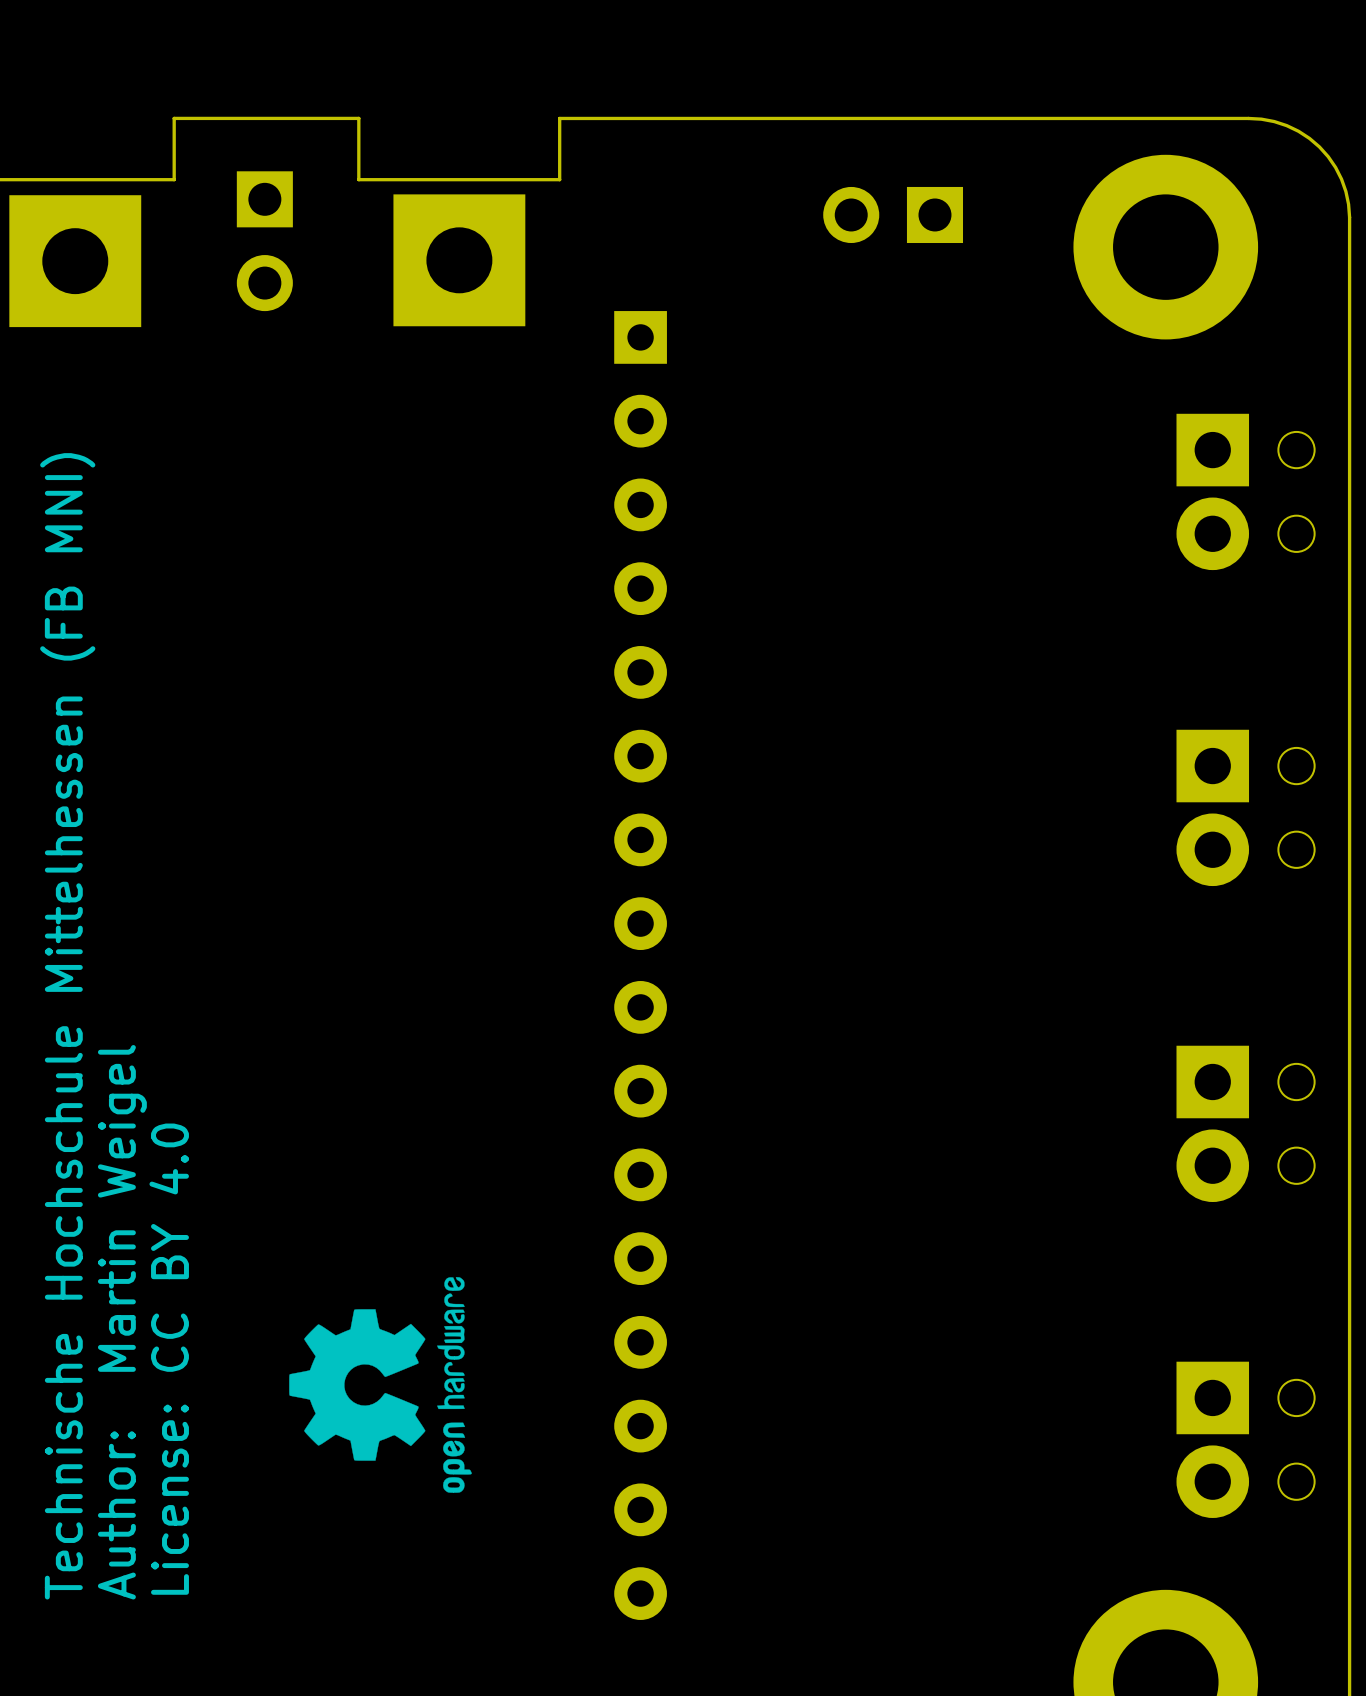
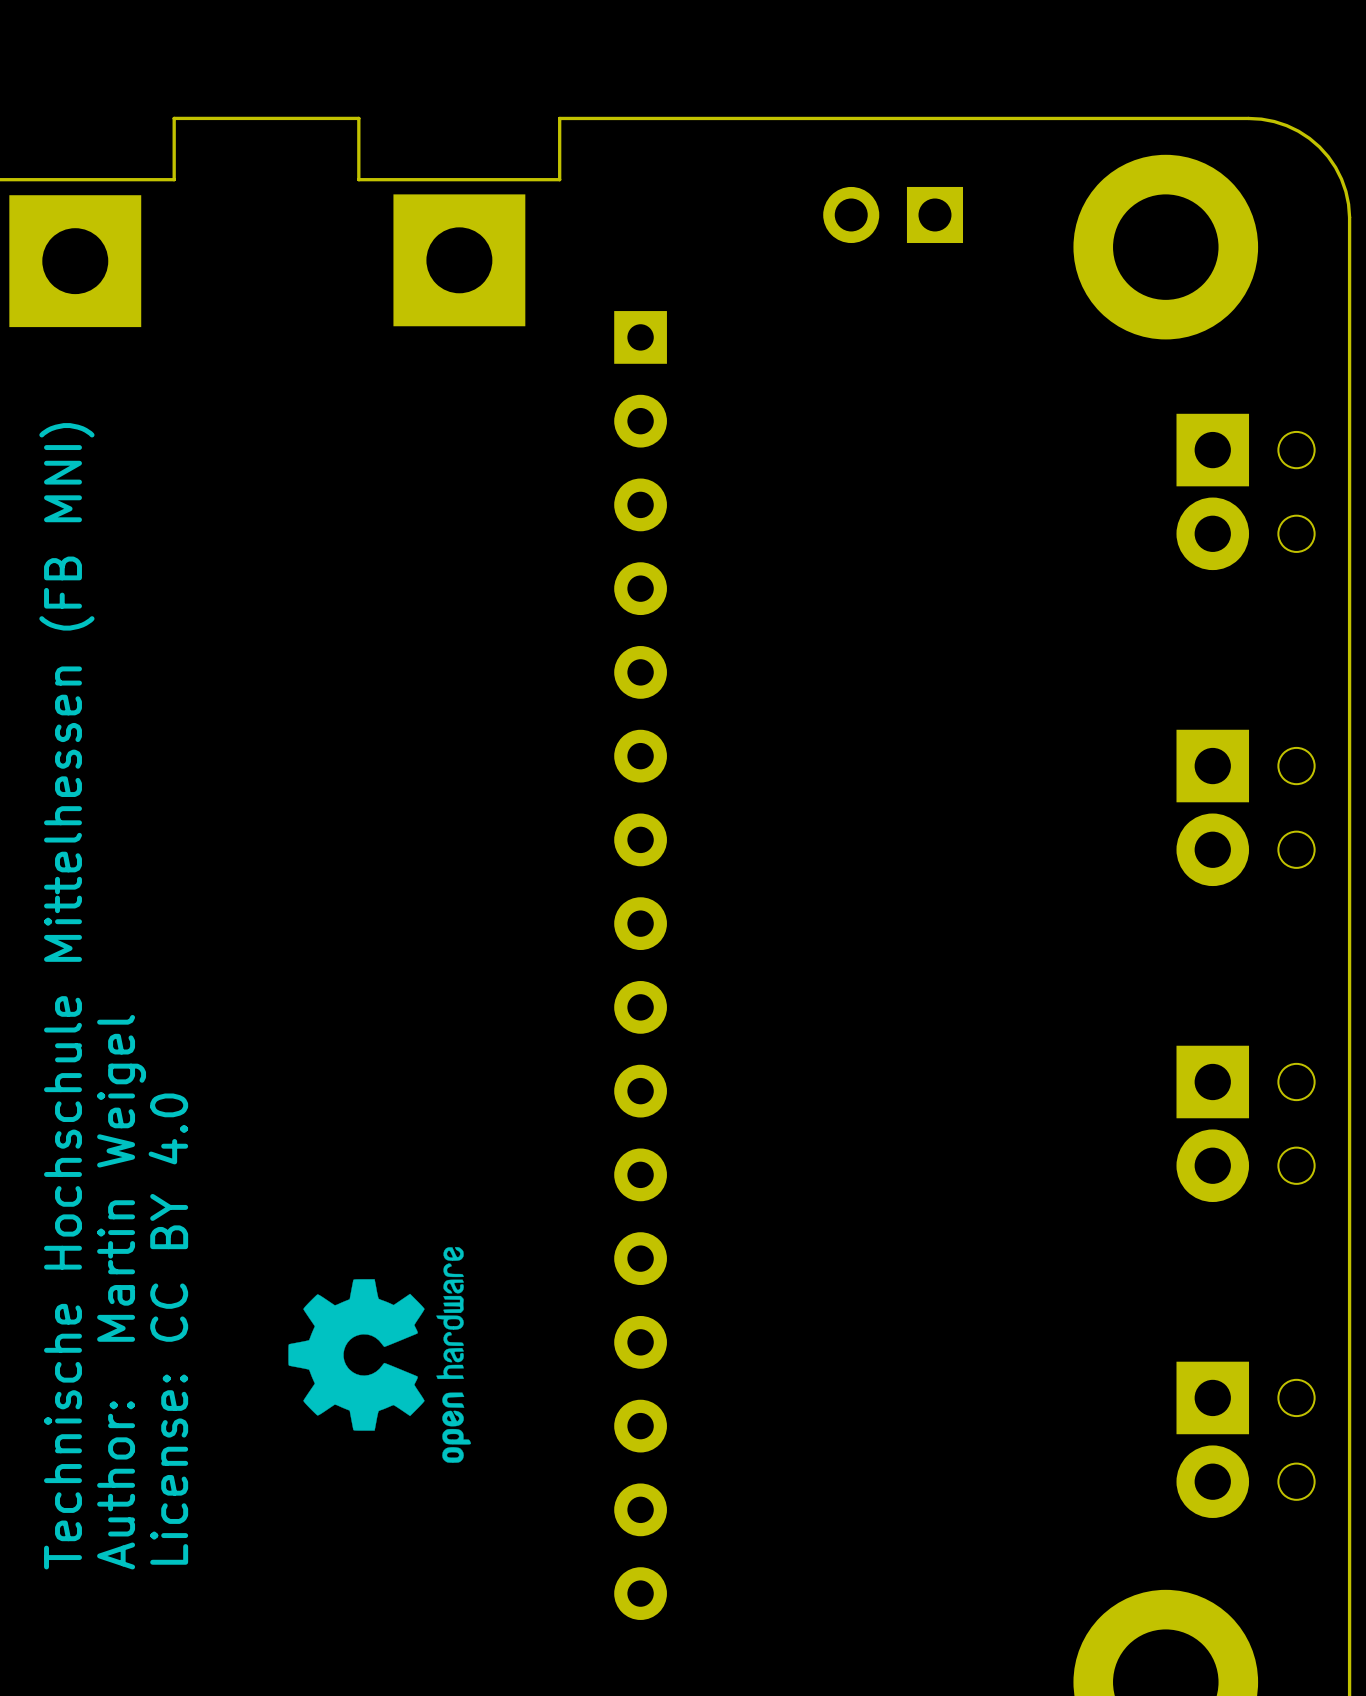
part: (264, 241) -> none
text position: Technische Hochschule Mittelhessen (FB MNI) (67, 1026) -> Technische Hochschule Mittelhessen (FB MNI) (66, 996)
text position: Author: Martin Weigel (122, 1322) -> Author: Martin Weigel (121, 1292)
text position: License: CC BY 4.0 (169, 1359) -> License: CC BY 4.0 (168, 1329)
drawing position: (380, 1384) -> (379, 1354)

